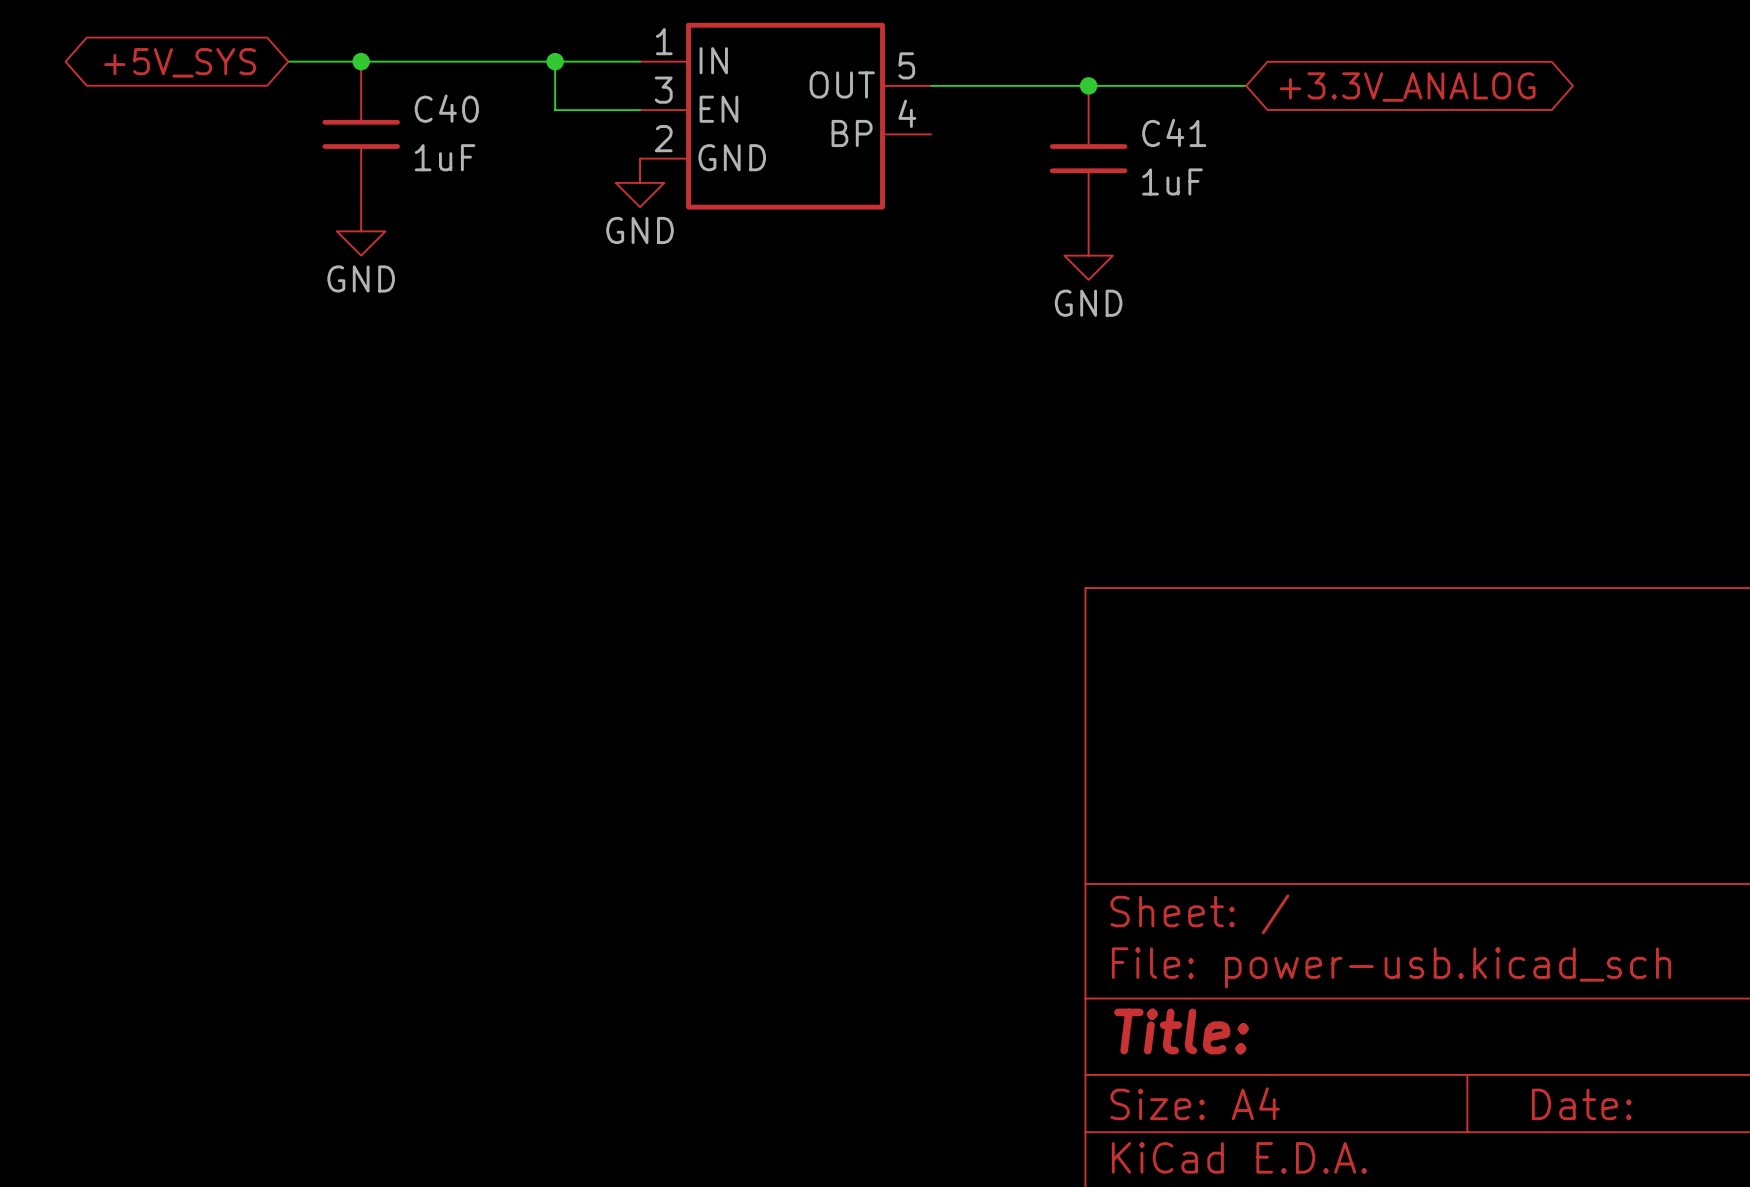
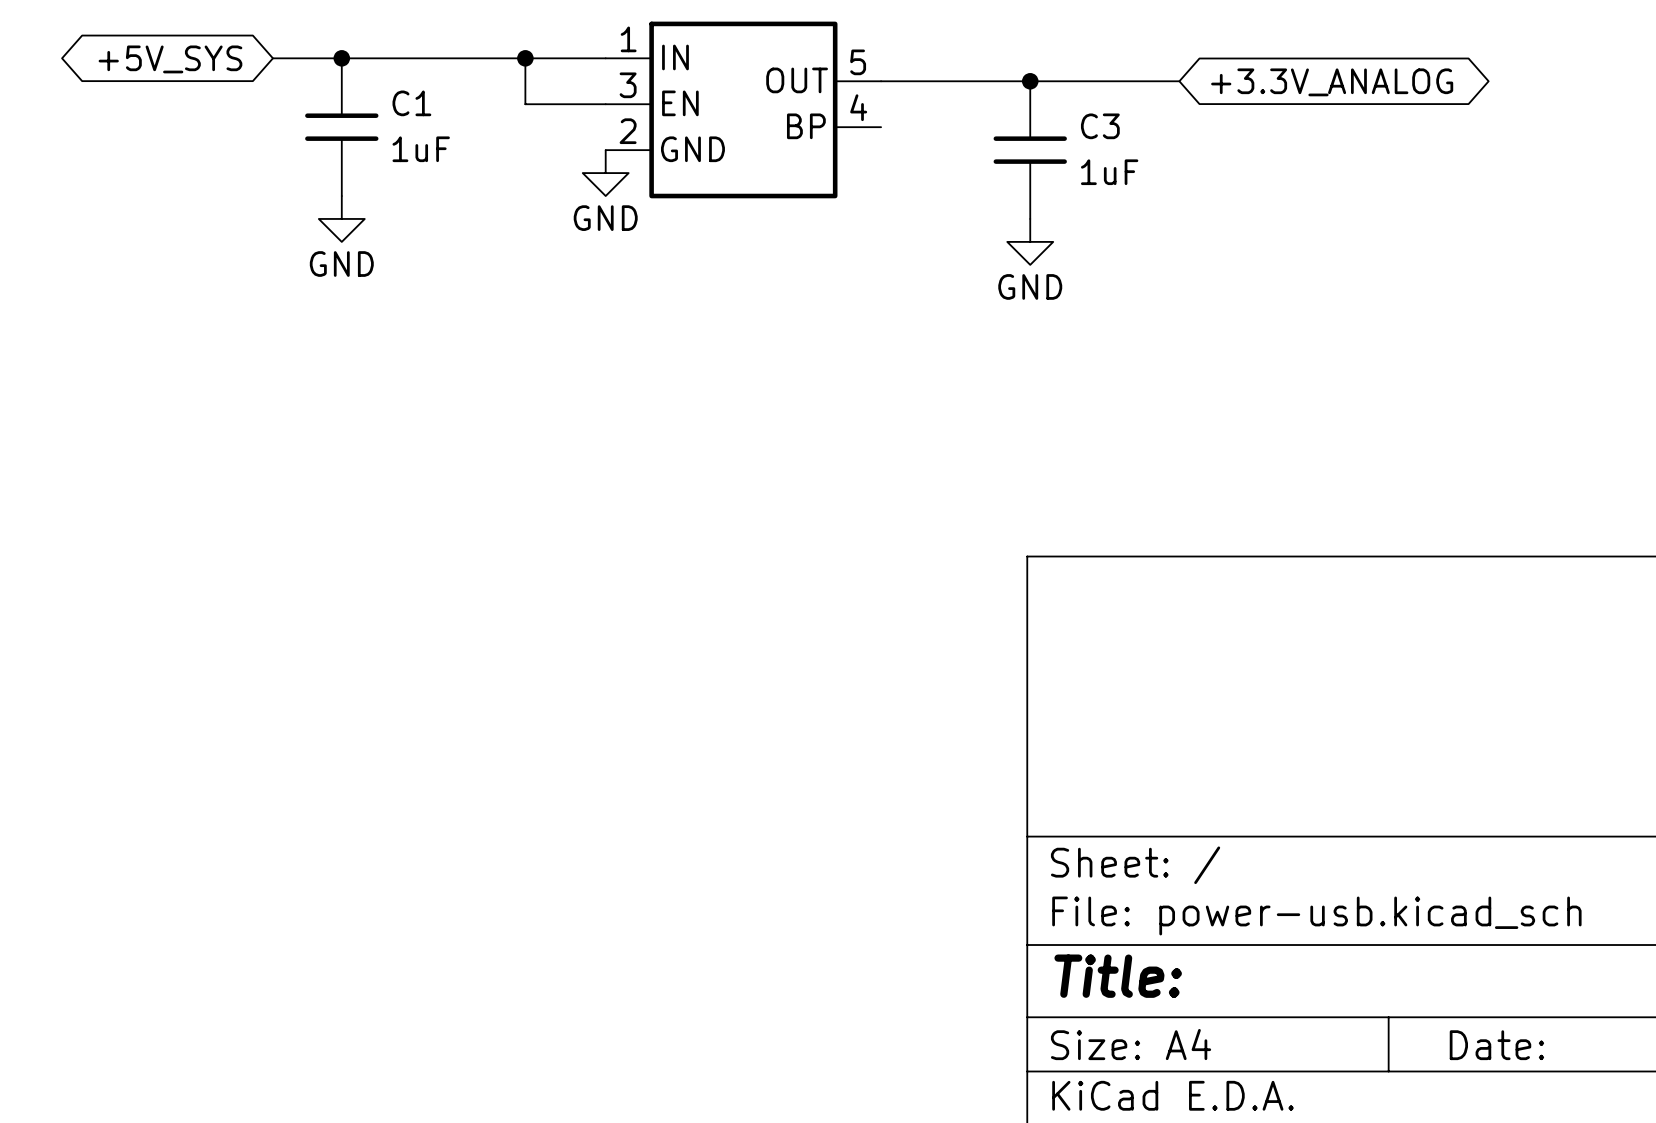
C40 name: C40 (446, 108) -> C1 (411, 103)
C41 name: C41 (1174, 132) -> C3 (1100, 126)

